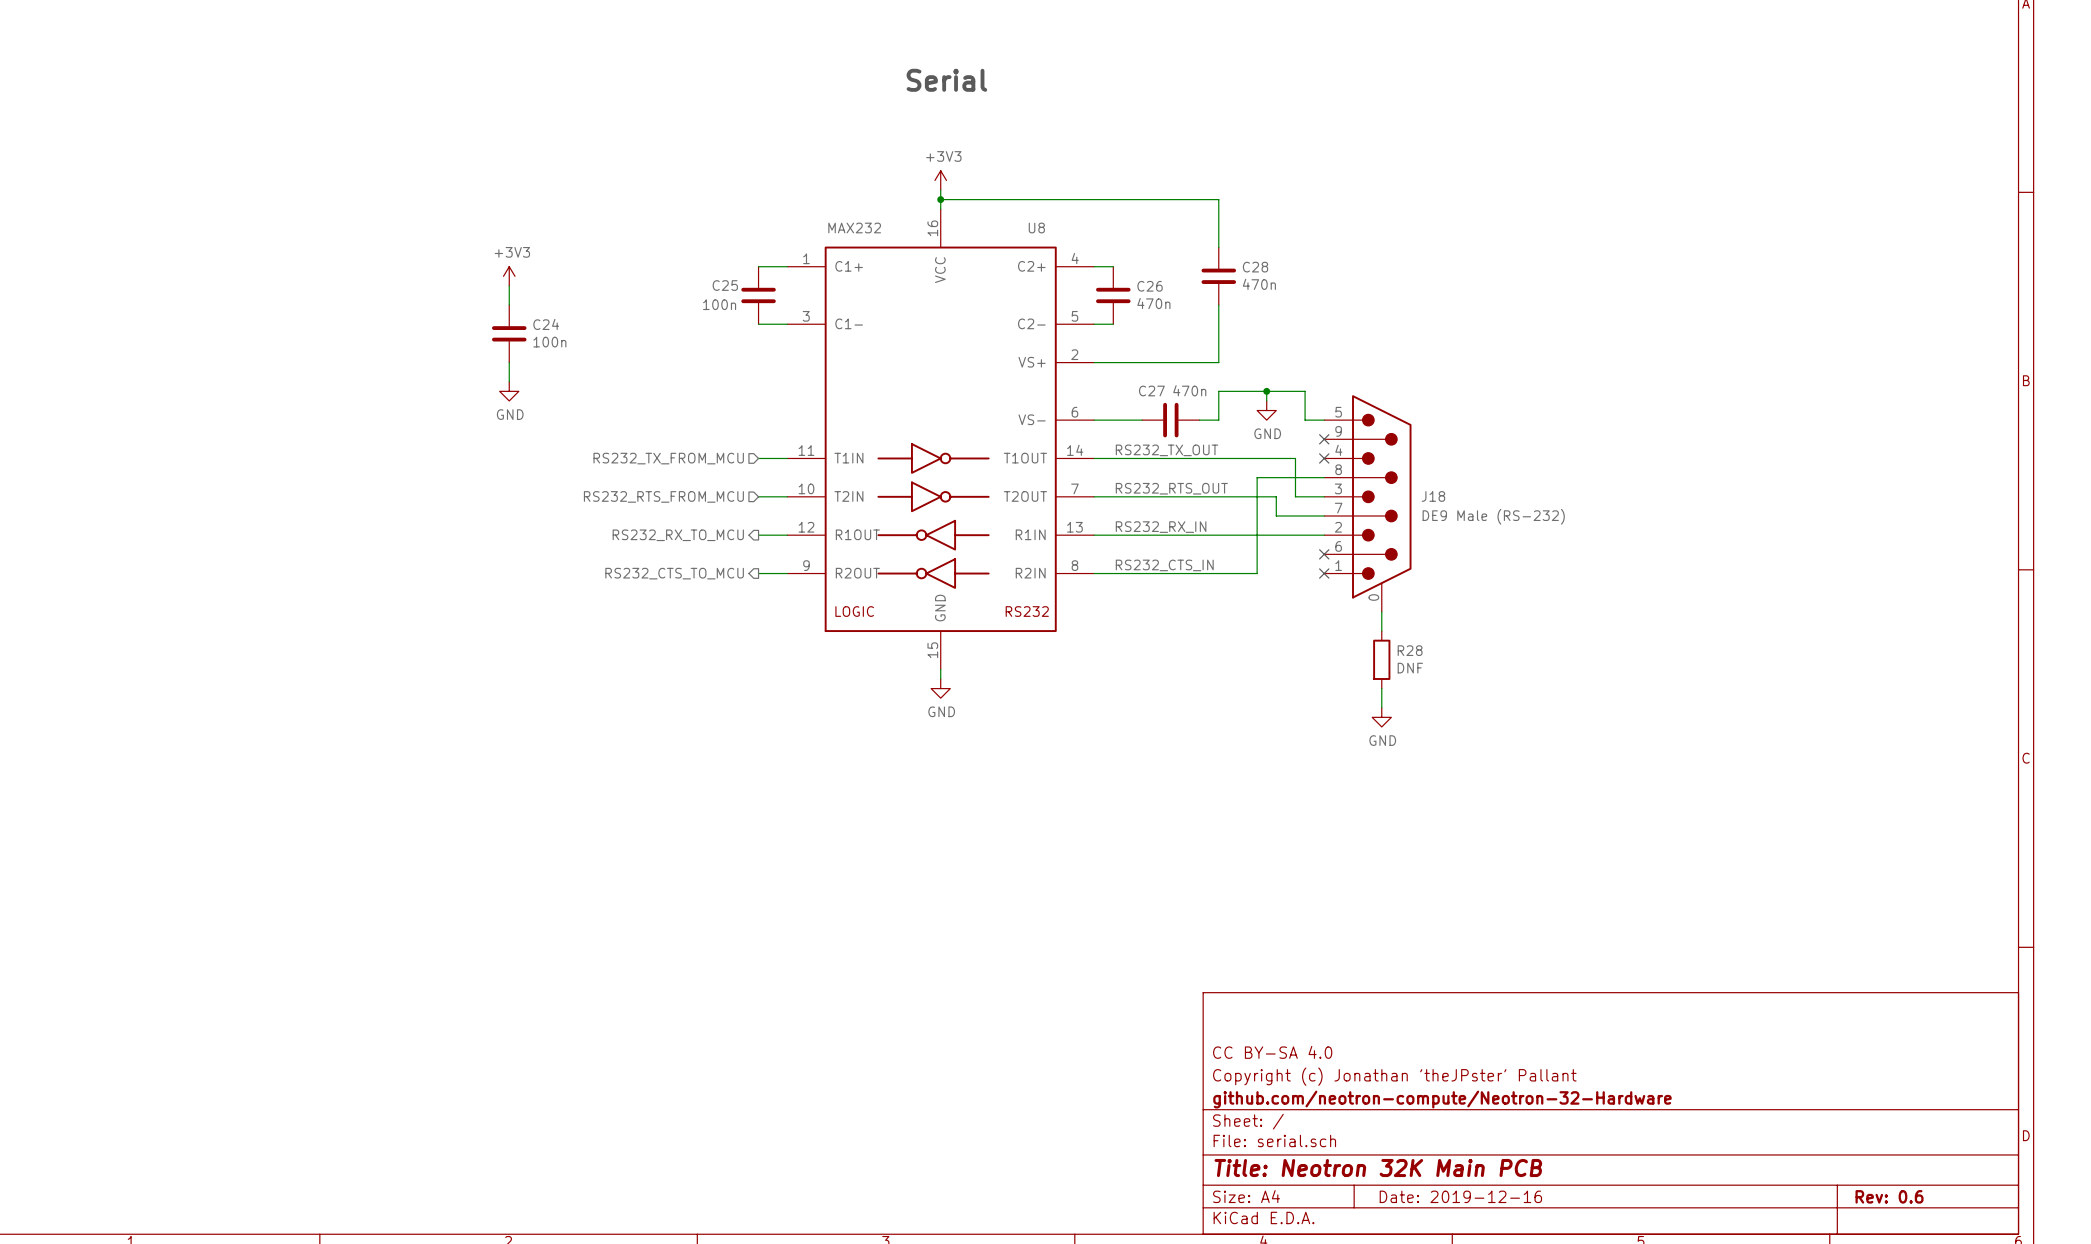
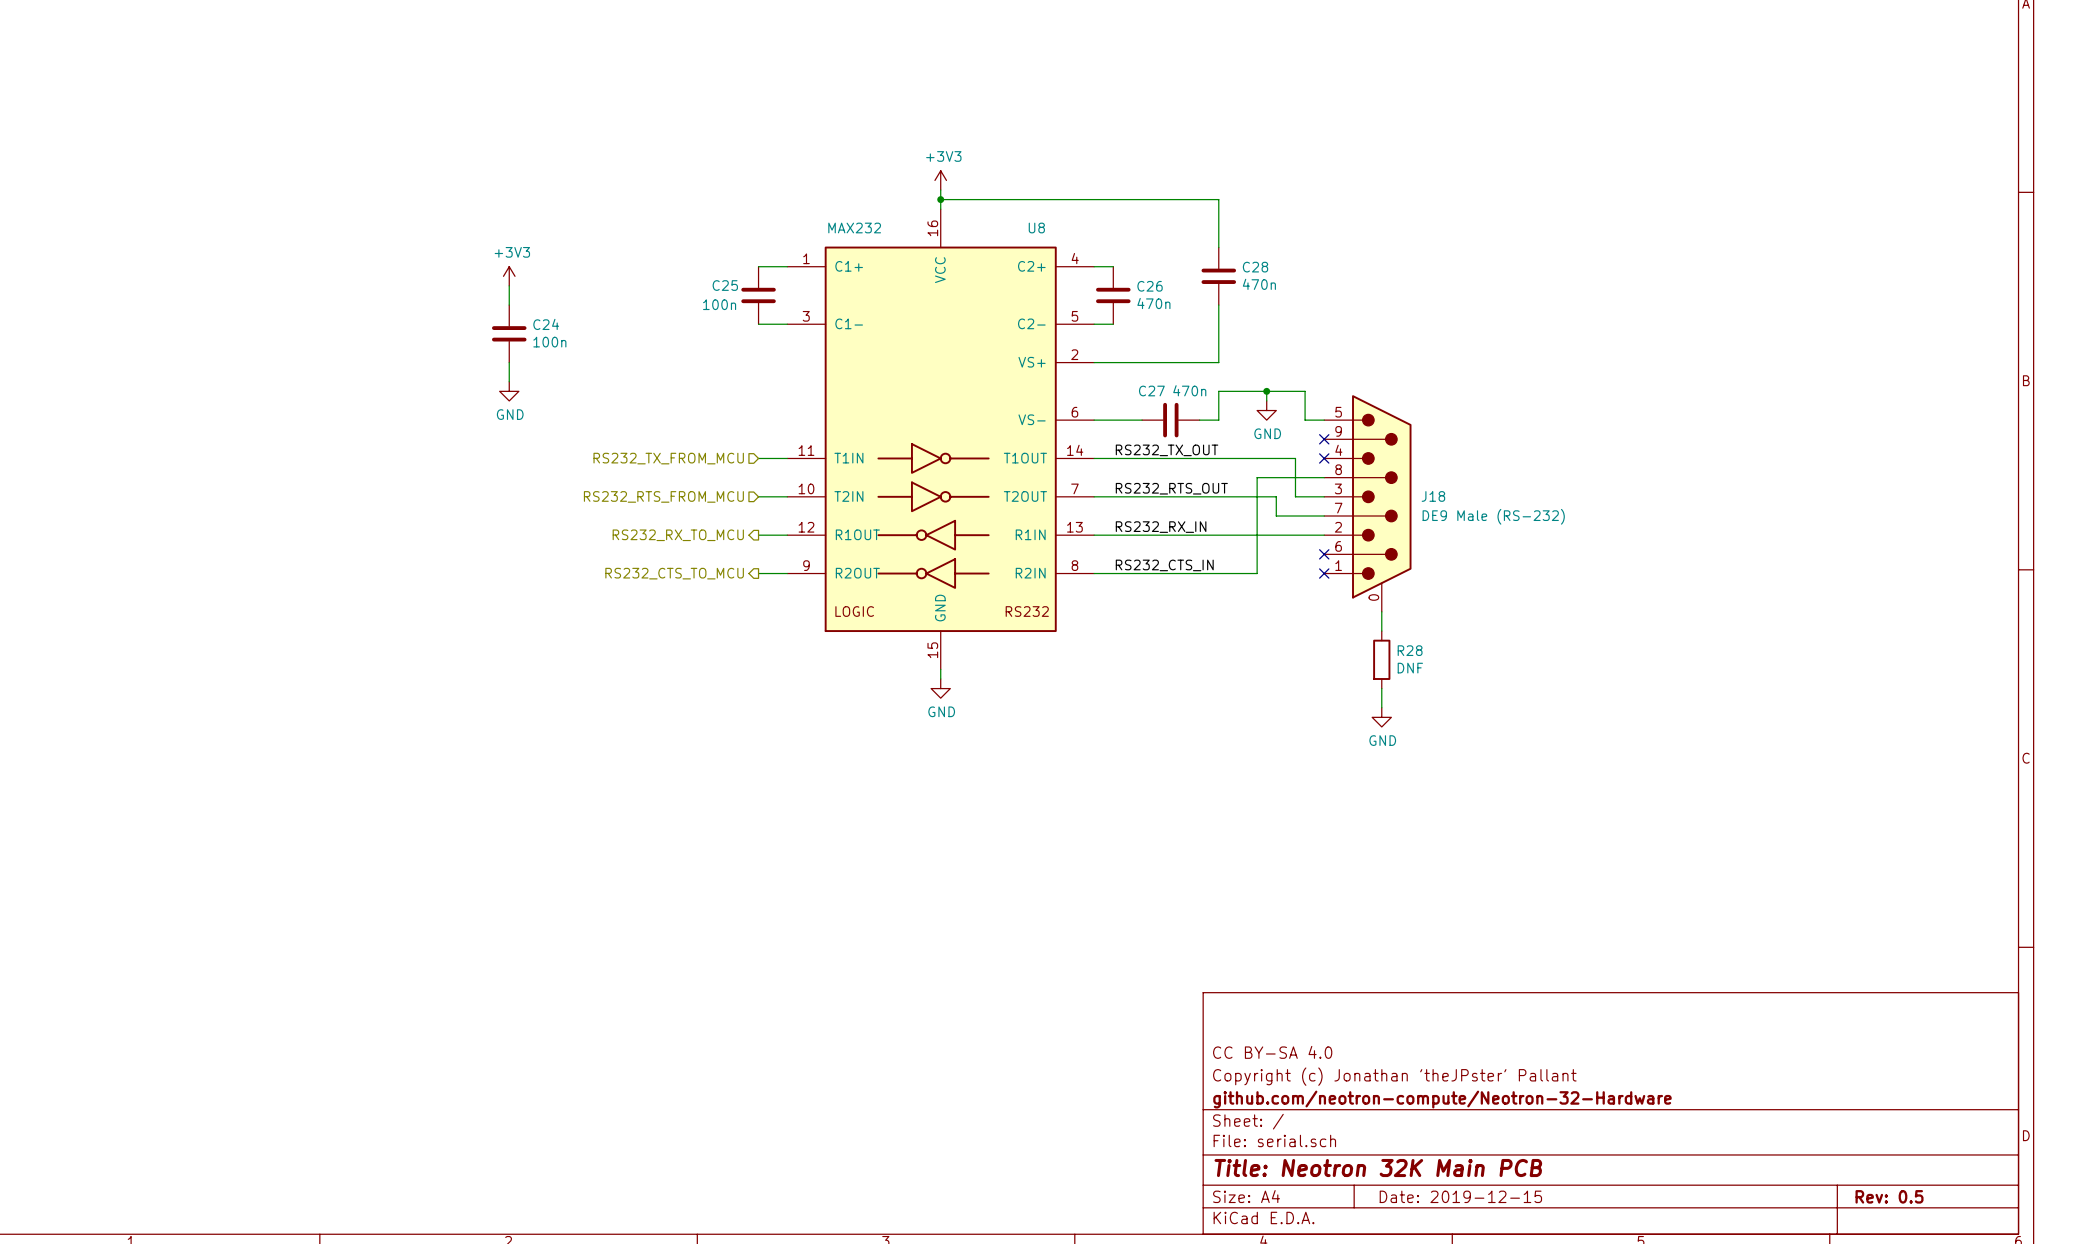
text: Serial (946, 80) -> none
title block: Date: 2019-12-16 (1460, 1196) -> Date: 2019-12-15 (1460, 1196)
title block: Rev: 0.6 (1889, 1196) -> Rev: 0.5 (1889, 1196)

